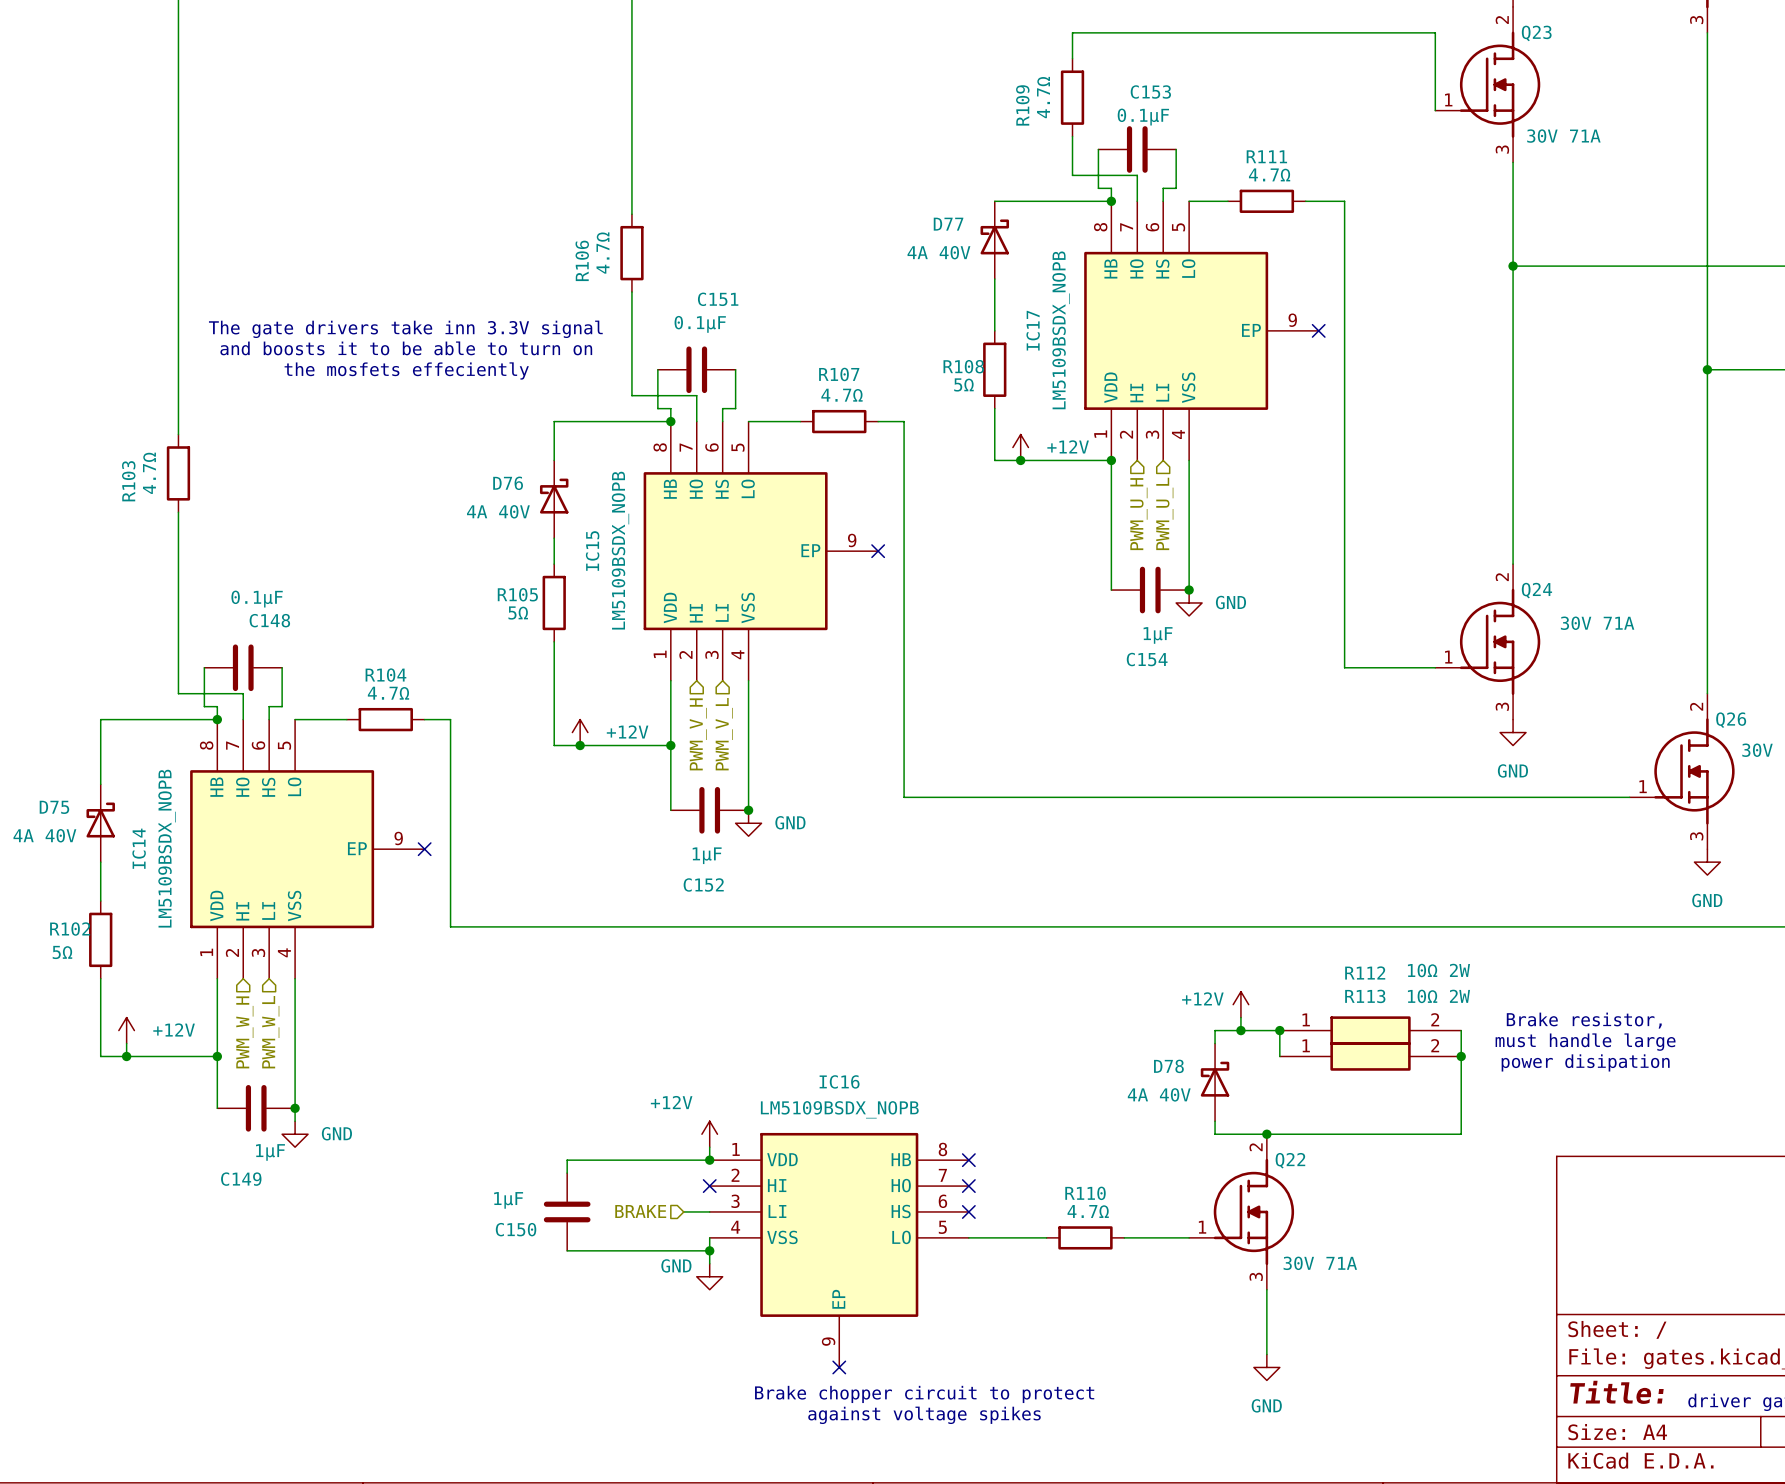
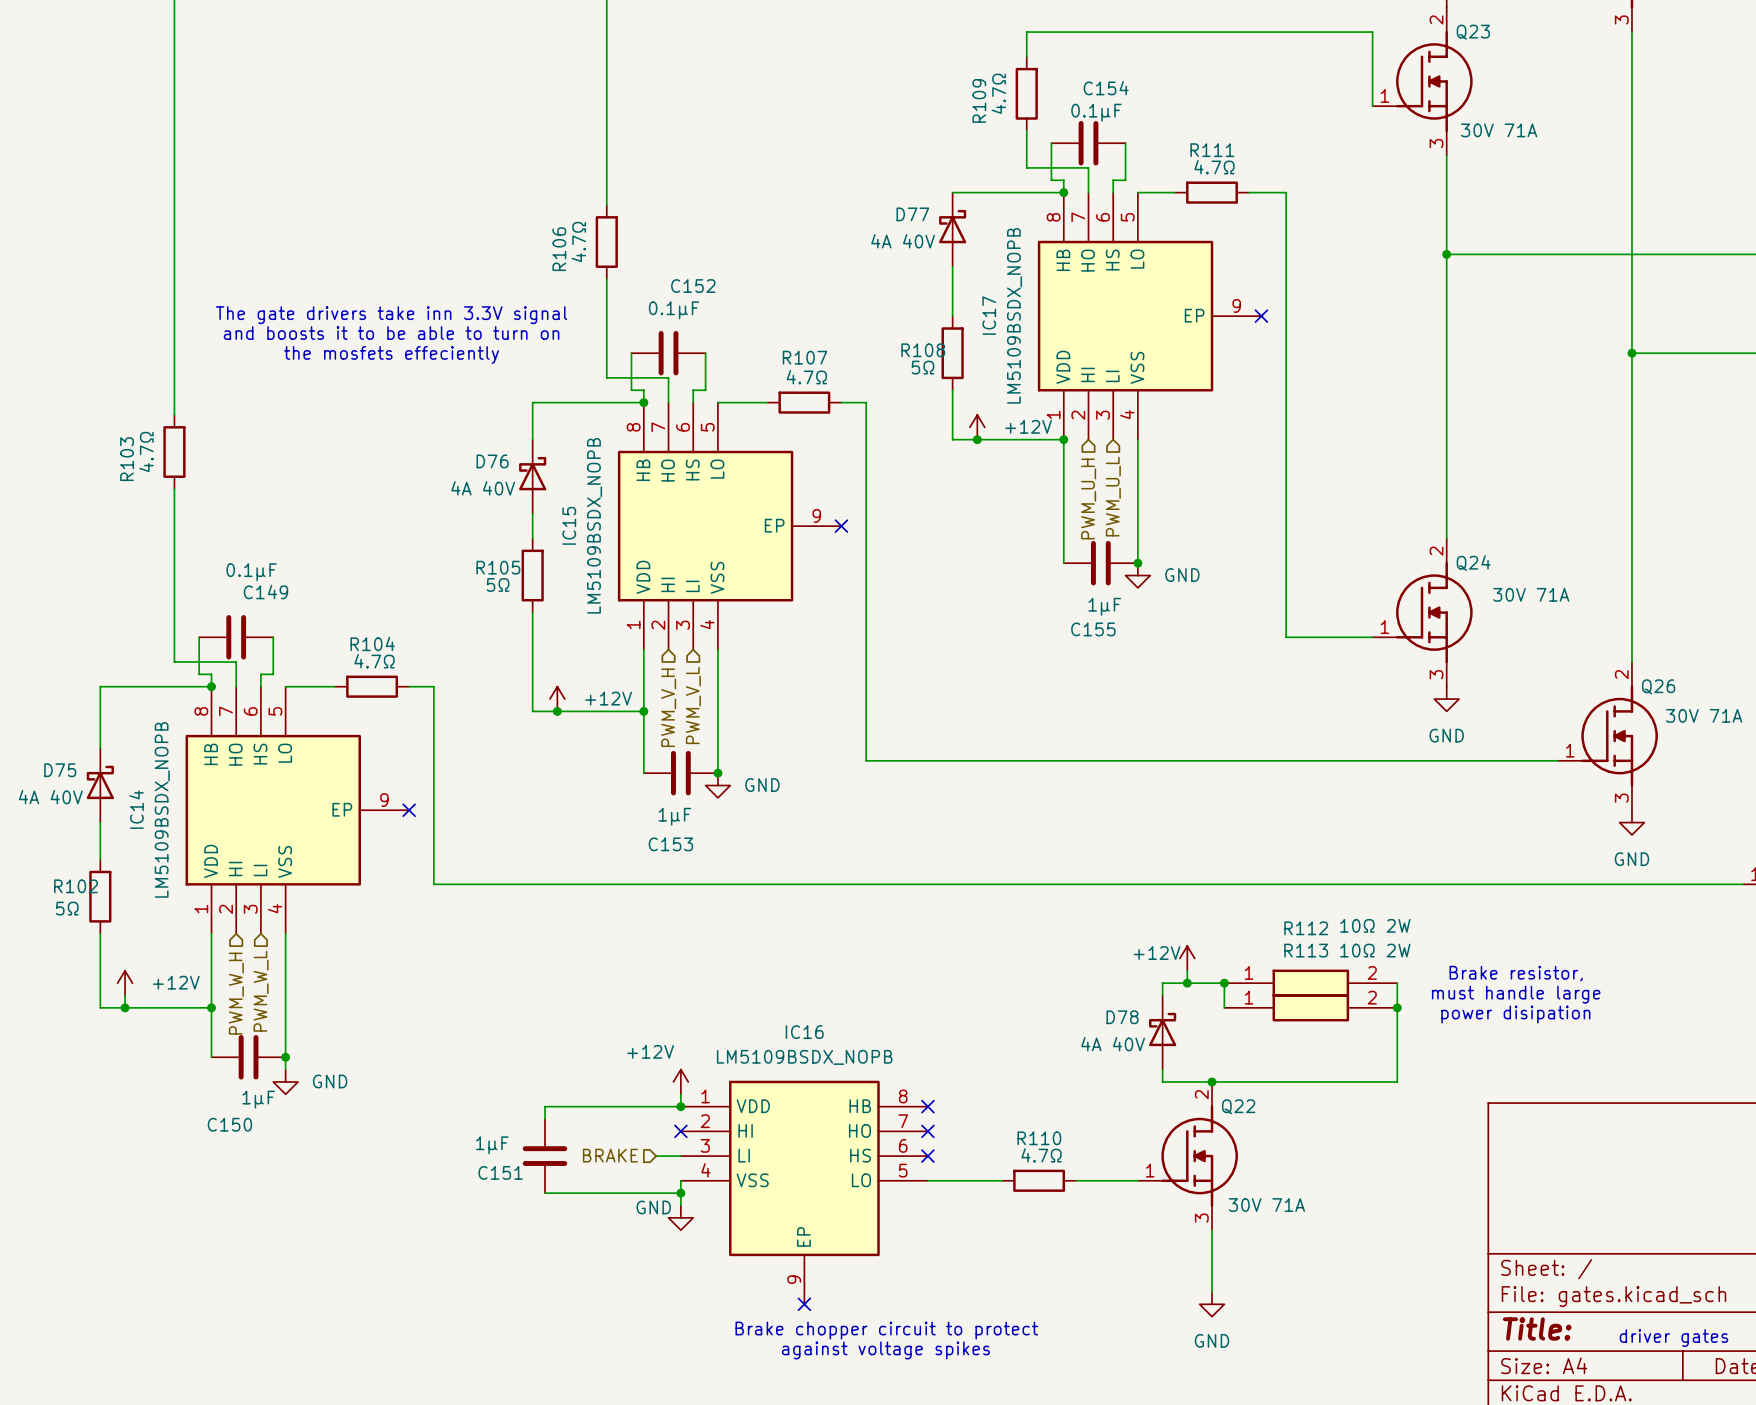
C153 name: C153 (1150, 92) -> C154 (1106, 88)
C151 name: C151 (718, 299) -> C152 (693, 286)
C148 name: C148 (269, 620) -> C149 (265, 592)
C154 name: C154 (1147, 659) -> C155 (1093, 629)
C152 name: C152 (703, 884) -> C153 (670, 844)
C149 name: C149 (241, 1179) -> C150 (229, 1124)
C150 name: C150 (516, 1229) -> C151 (500, 1172)

